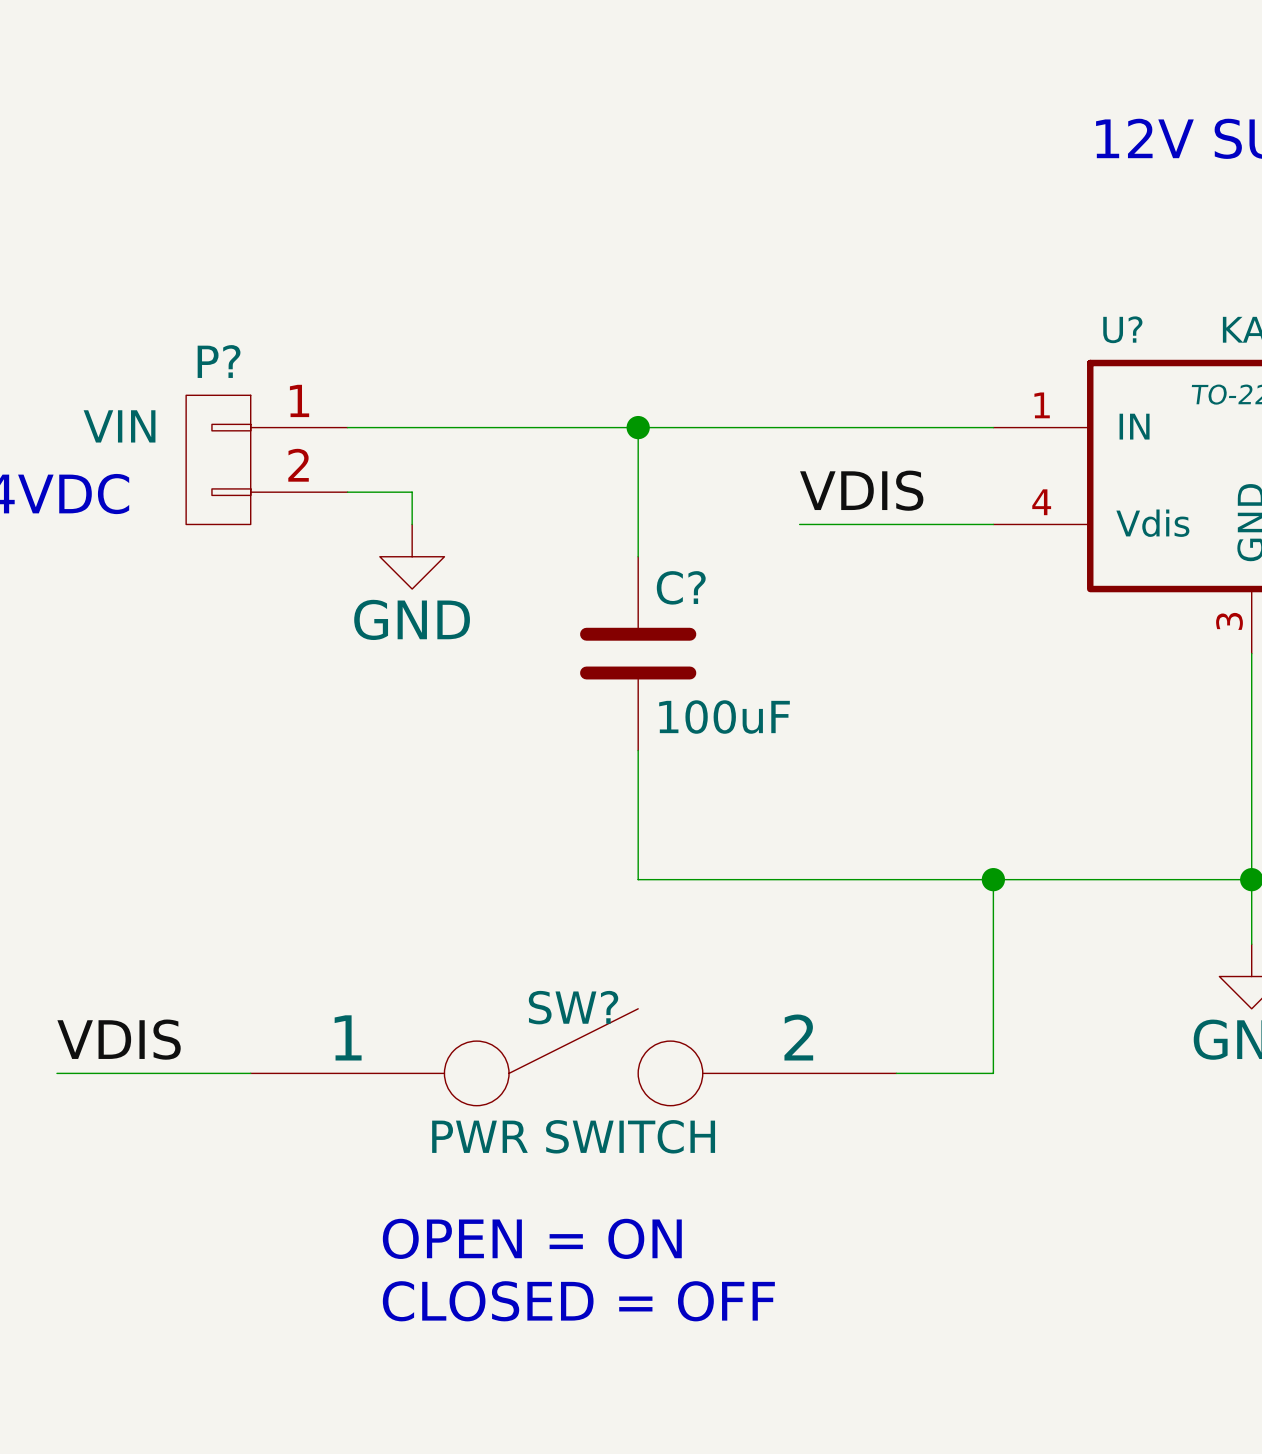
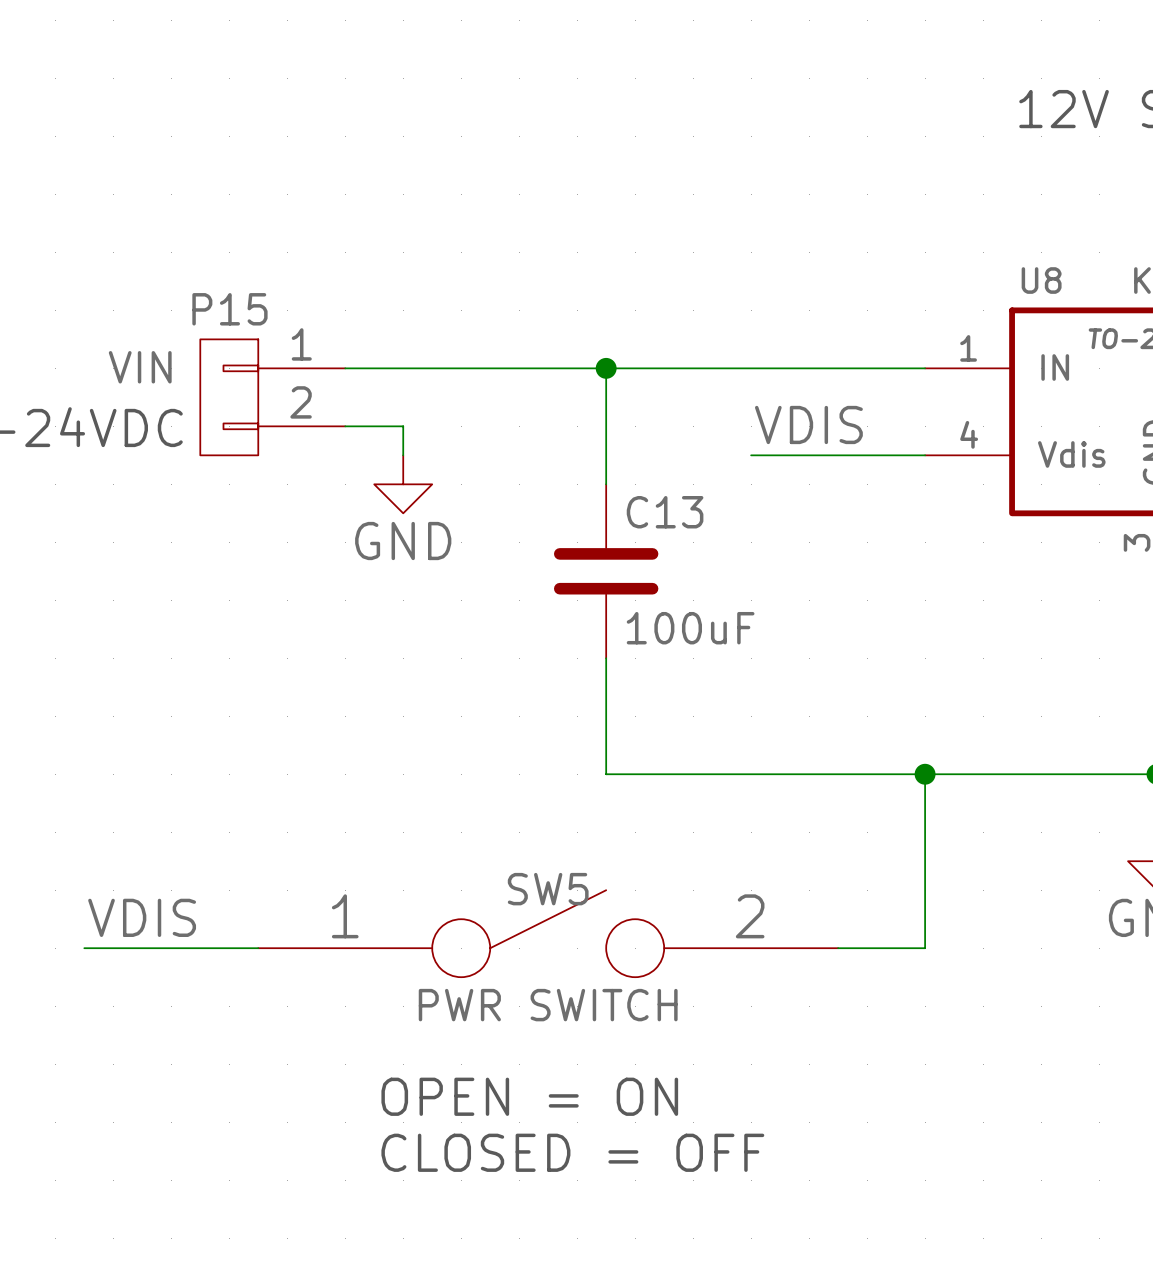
U? name: U? (1122, 329) -> U8 (1041, 280)
P? name: P? (219, 361) -> P15 (229, 309)
C? name: C? (681, 587) -> C13 (665, 512)
SW? name: SW? (573, 1007) -> SW5 (548, 889)

